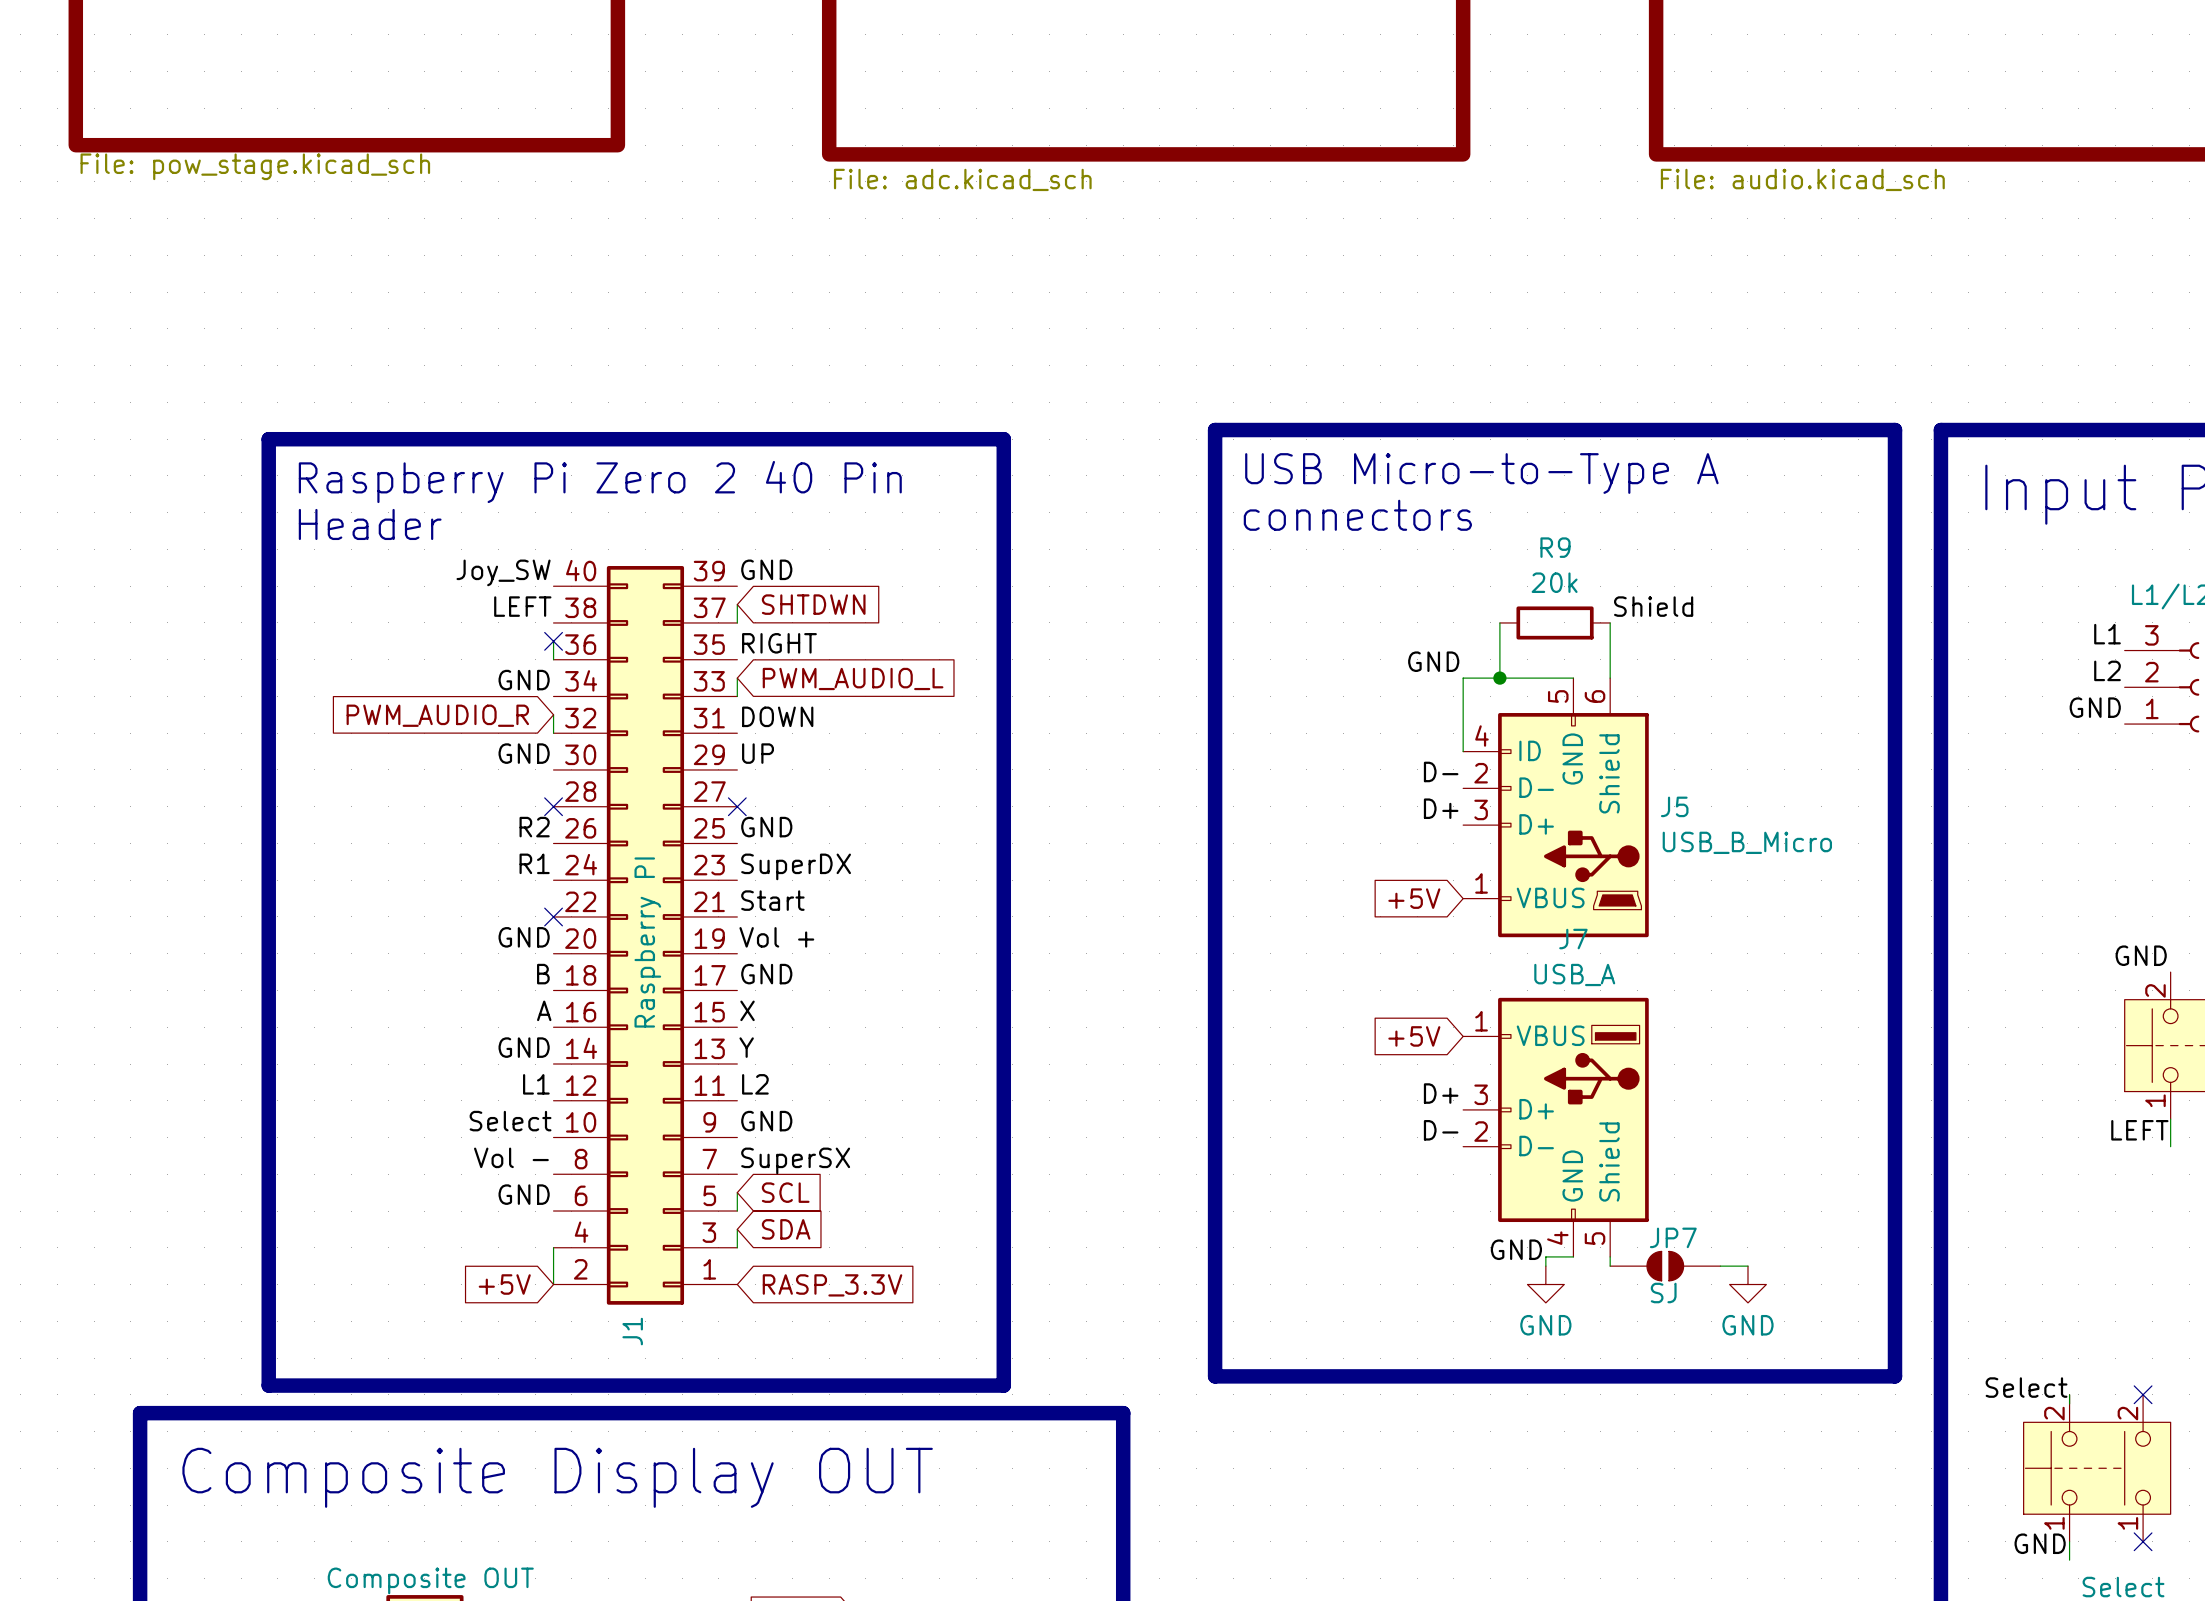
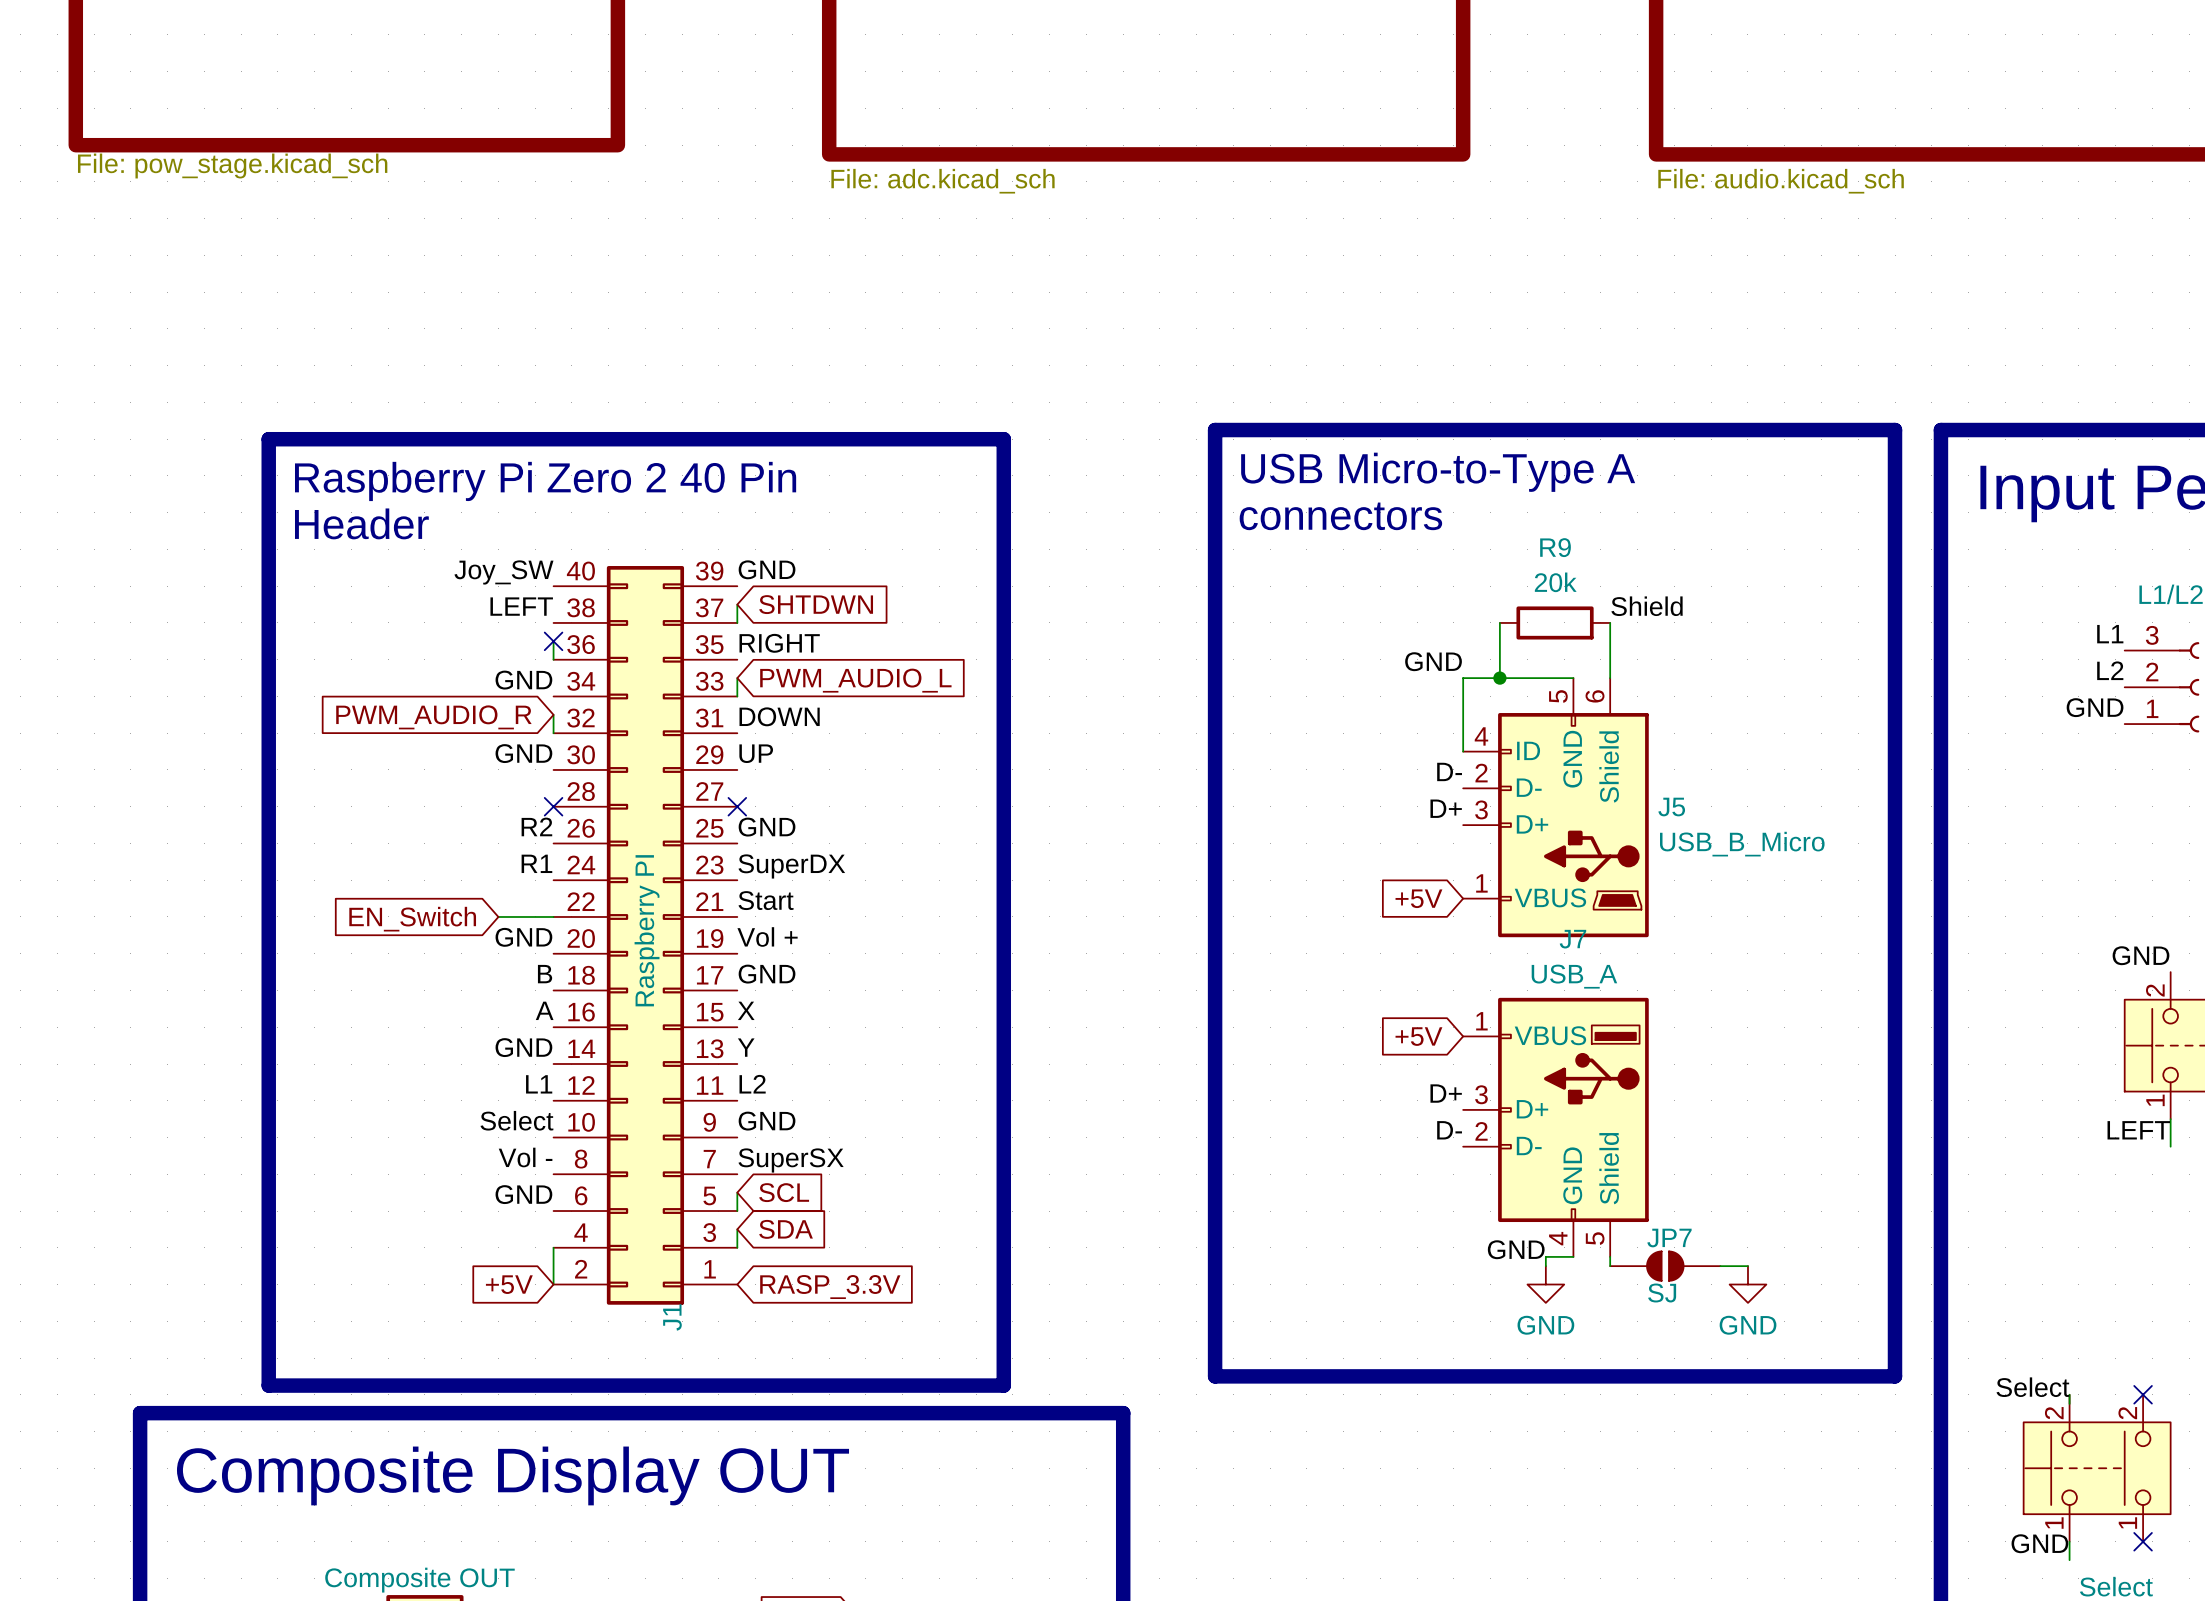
wire: none -> (498, 916) (553, 916)
no-connect mark: (553, 916) -> none
global label: none -> EN_Switch (412, 919)
J1 name position: J1 (632, 1331) -> J1 (672, 1317)

